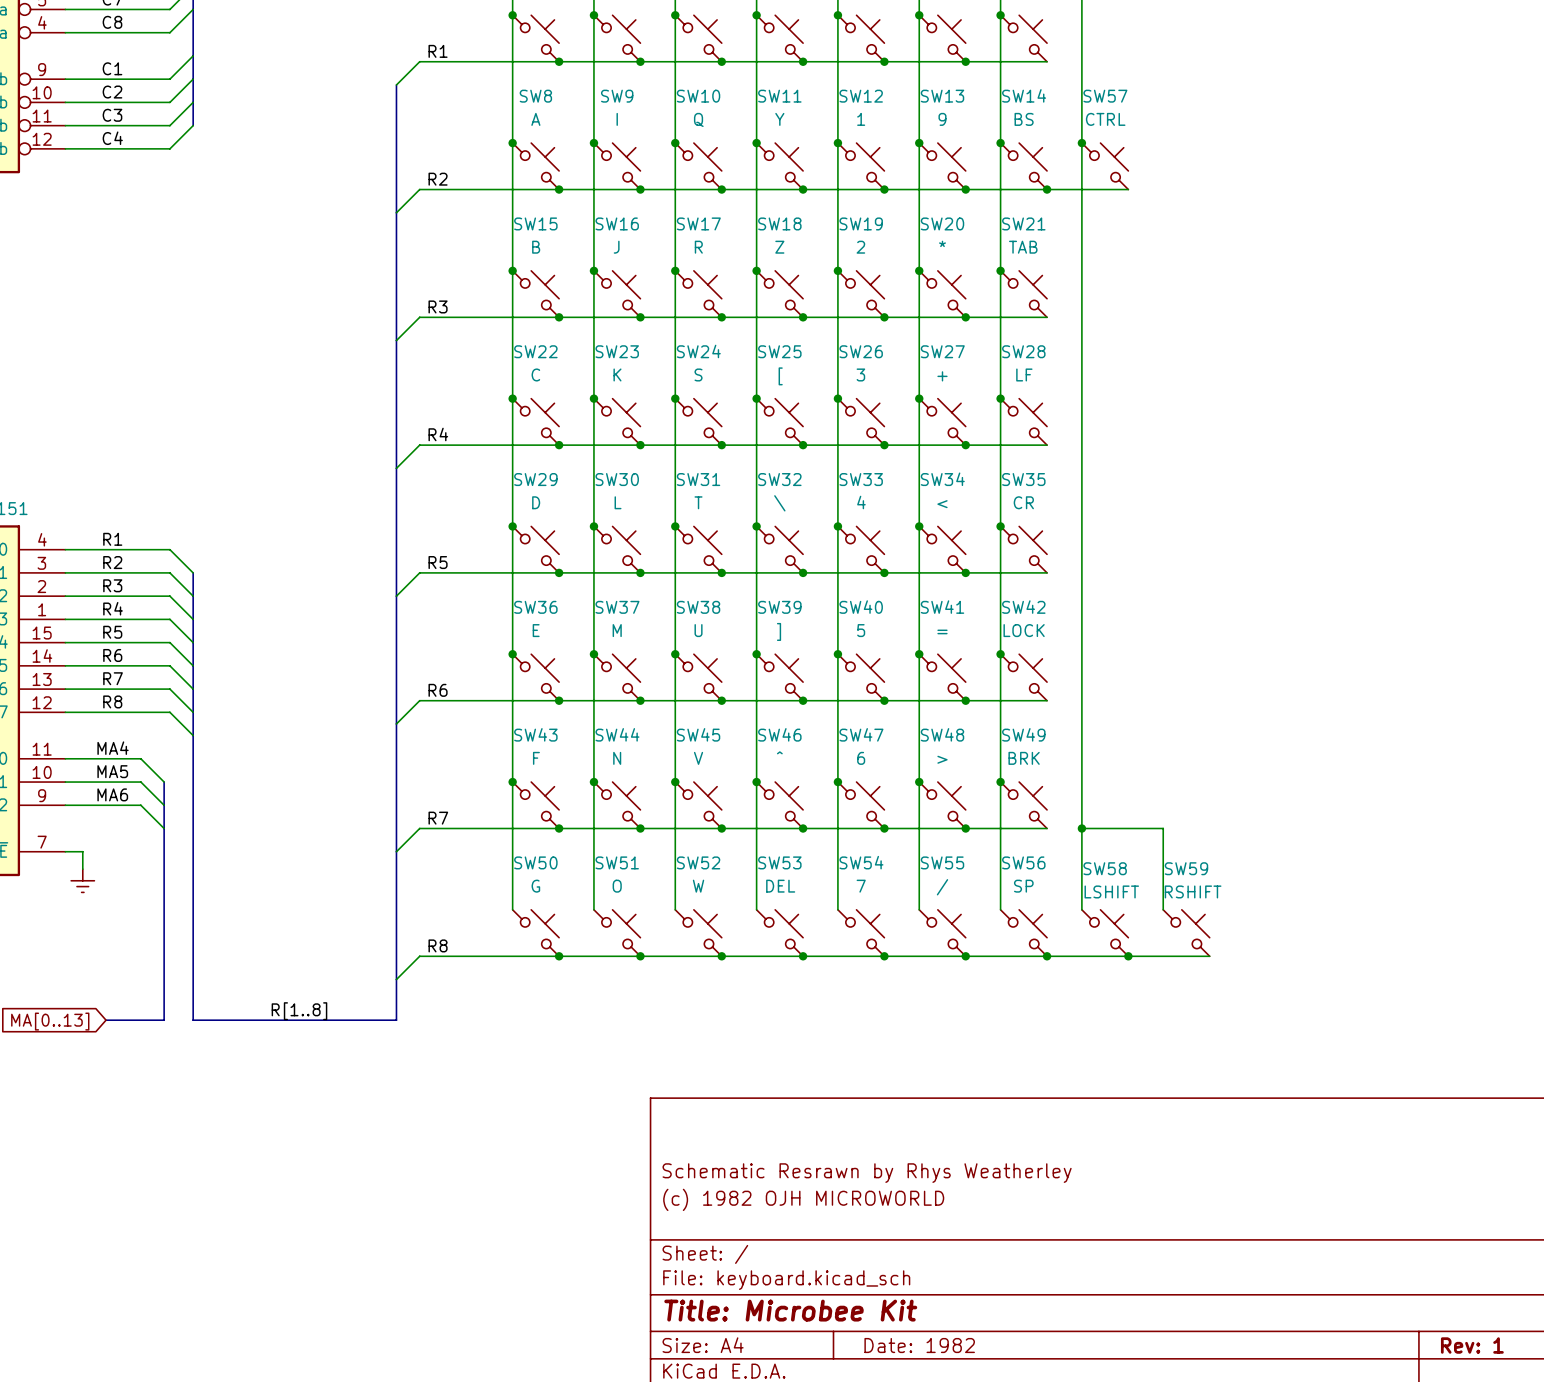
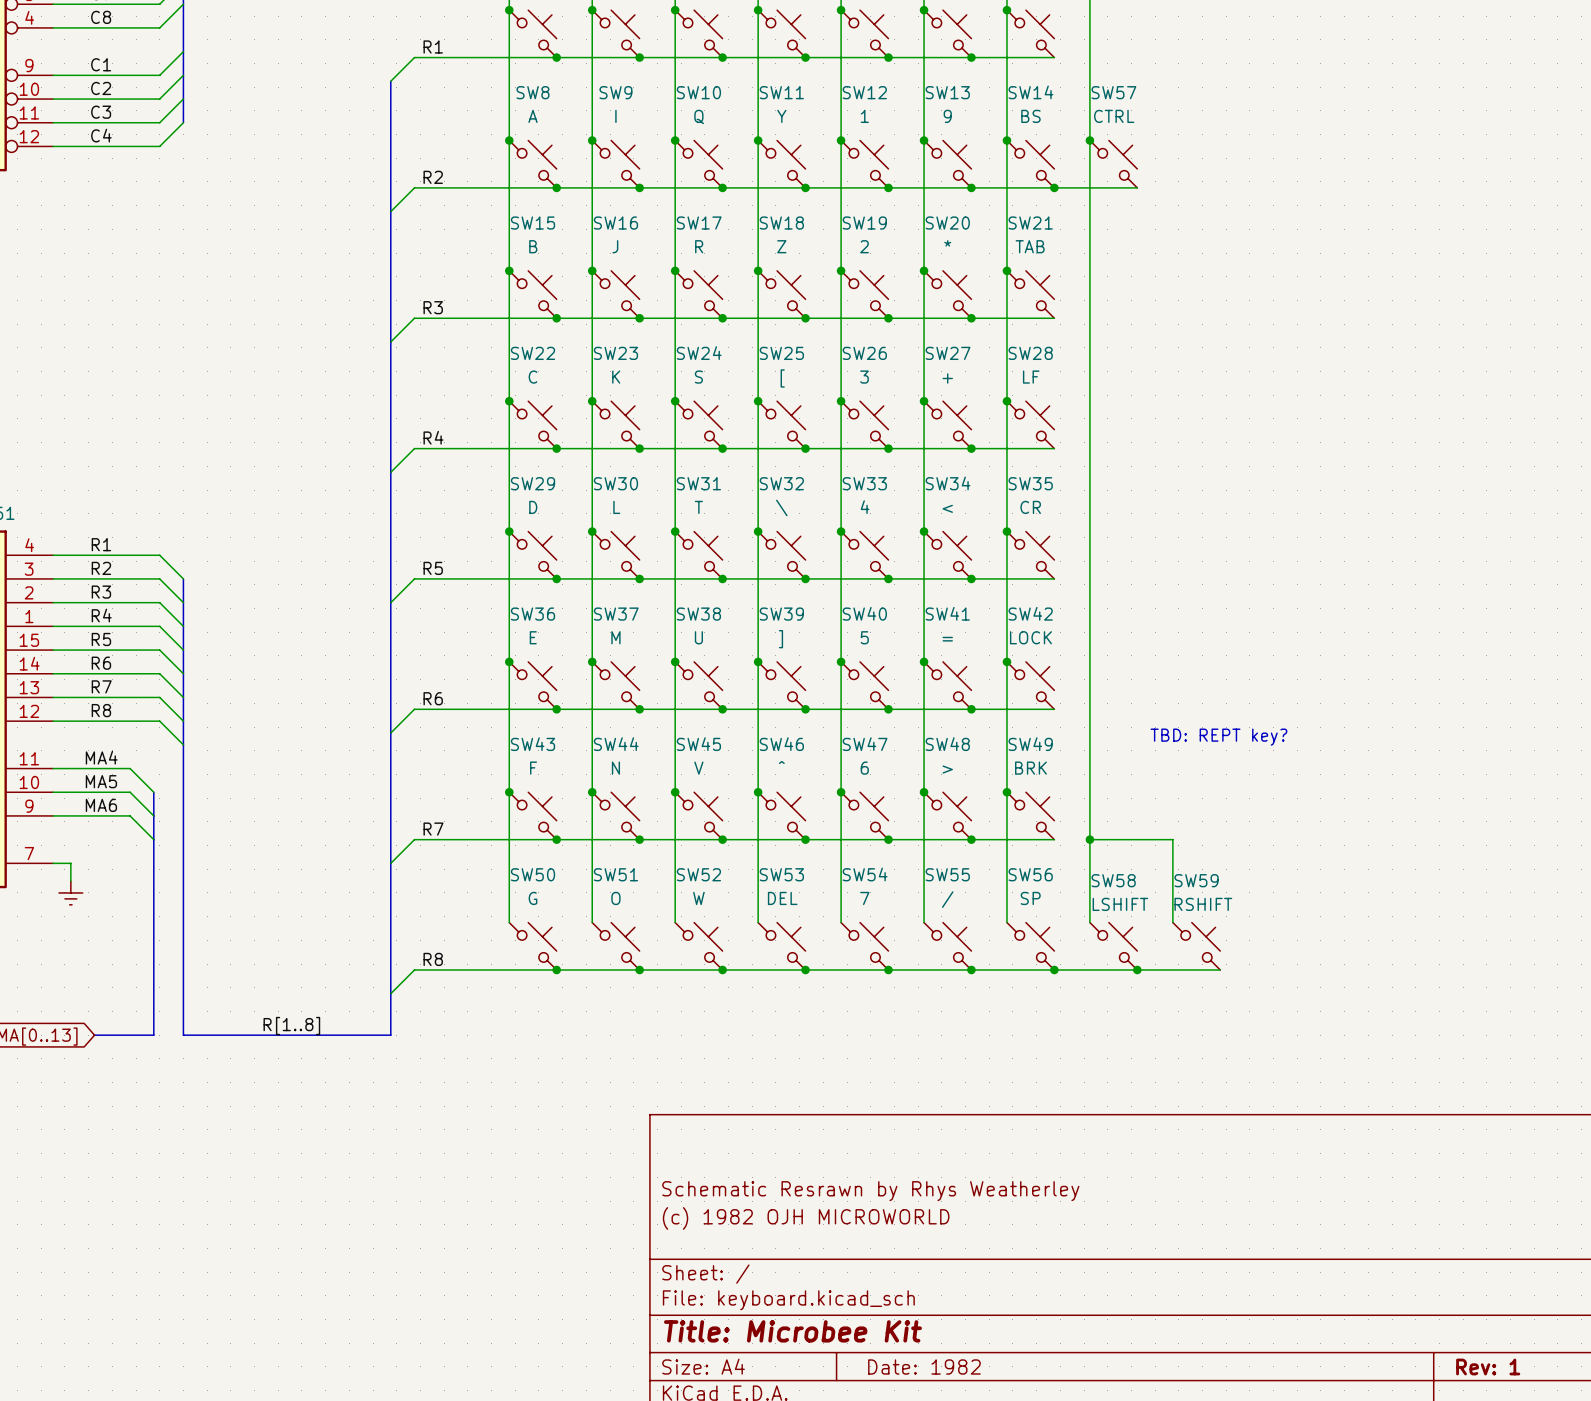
text: none -> TBD: REPT key? (1218, 737)

